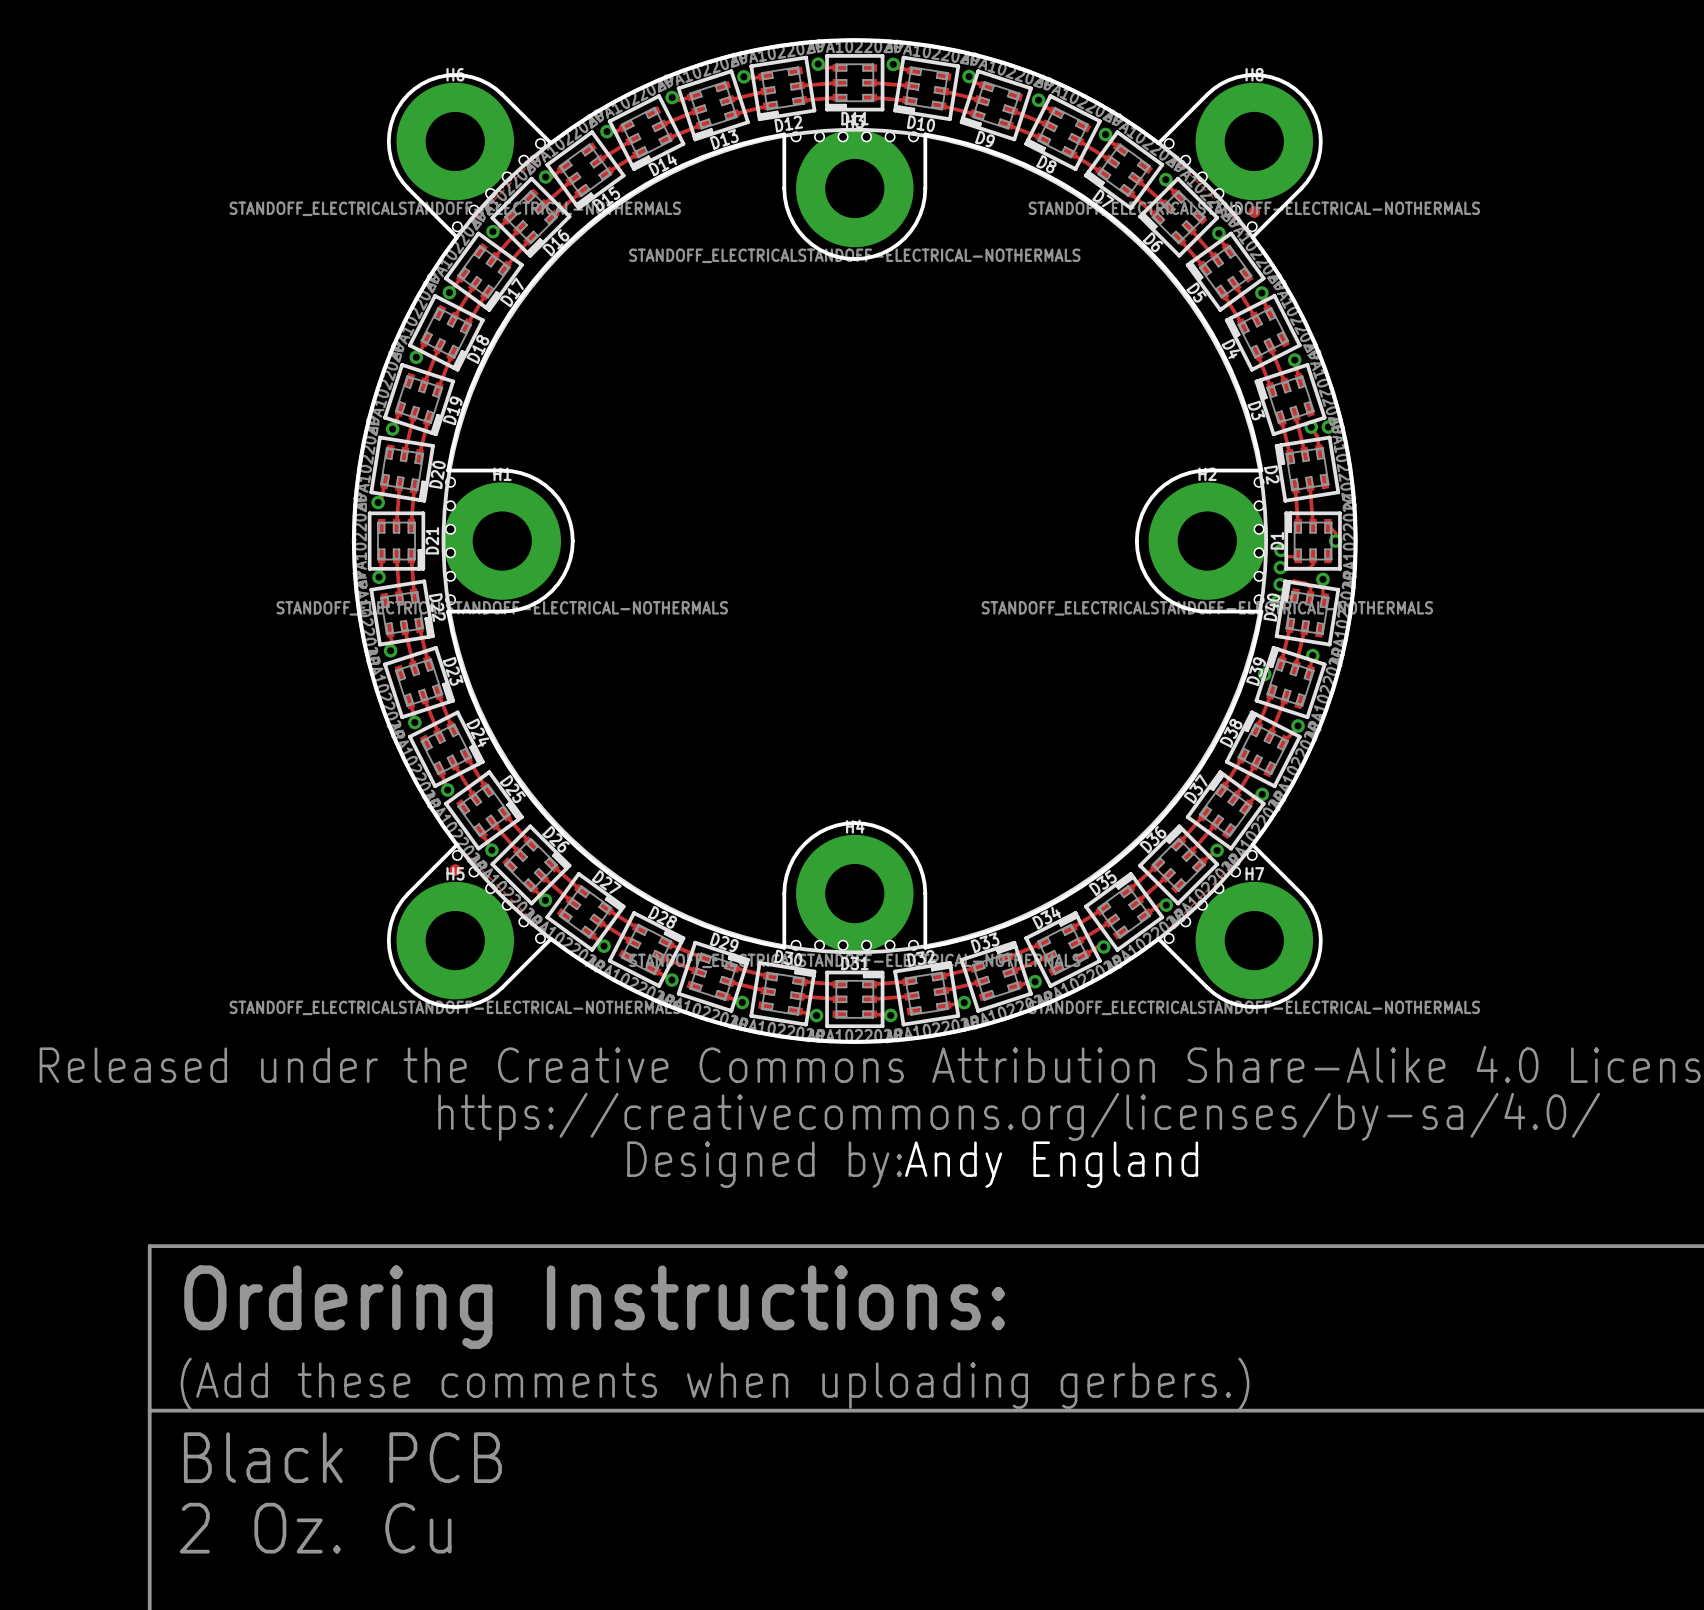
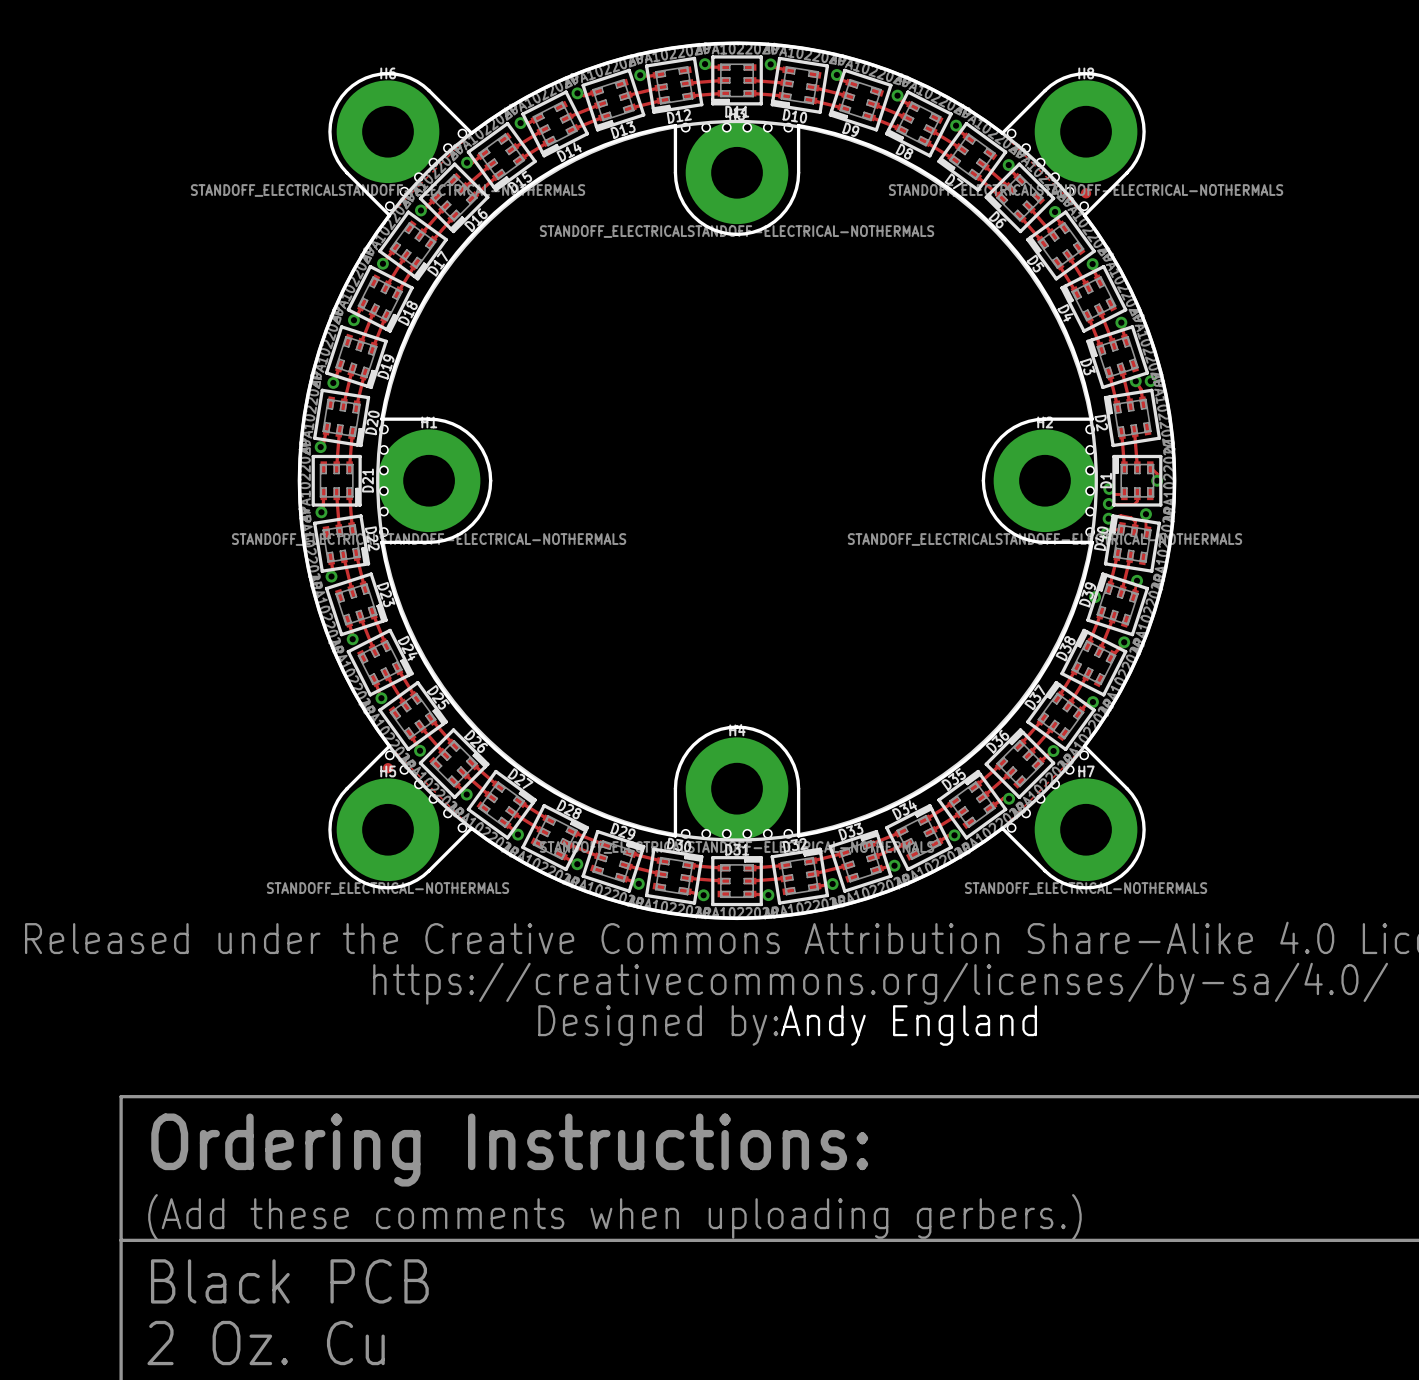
H5 value: STANDOFF_ELECTRICALSTANDOFF-ELECTRICAL-NOTHERMALS (455, 1007) -> STANDOFF_ELECTRICAL-NOTHERMALS (388, 888)
H7 value: STANDOFF_ELECTRICALSTANDOFF-ELECTRICAL-NOTHERMALS (1254, 1007) -> STANDOFF_ELECTRICAL-NOTHERMALS (1086, 888)

